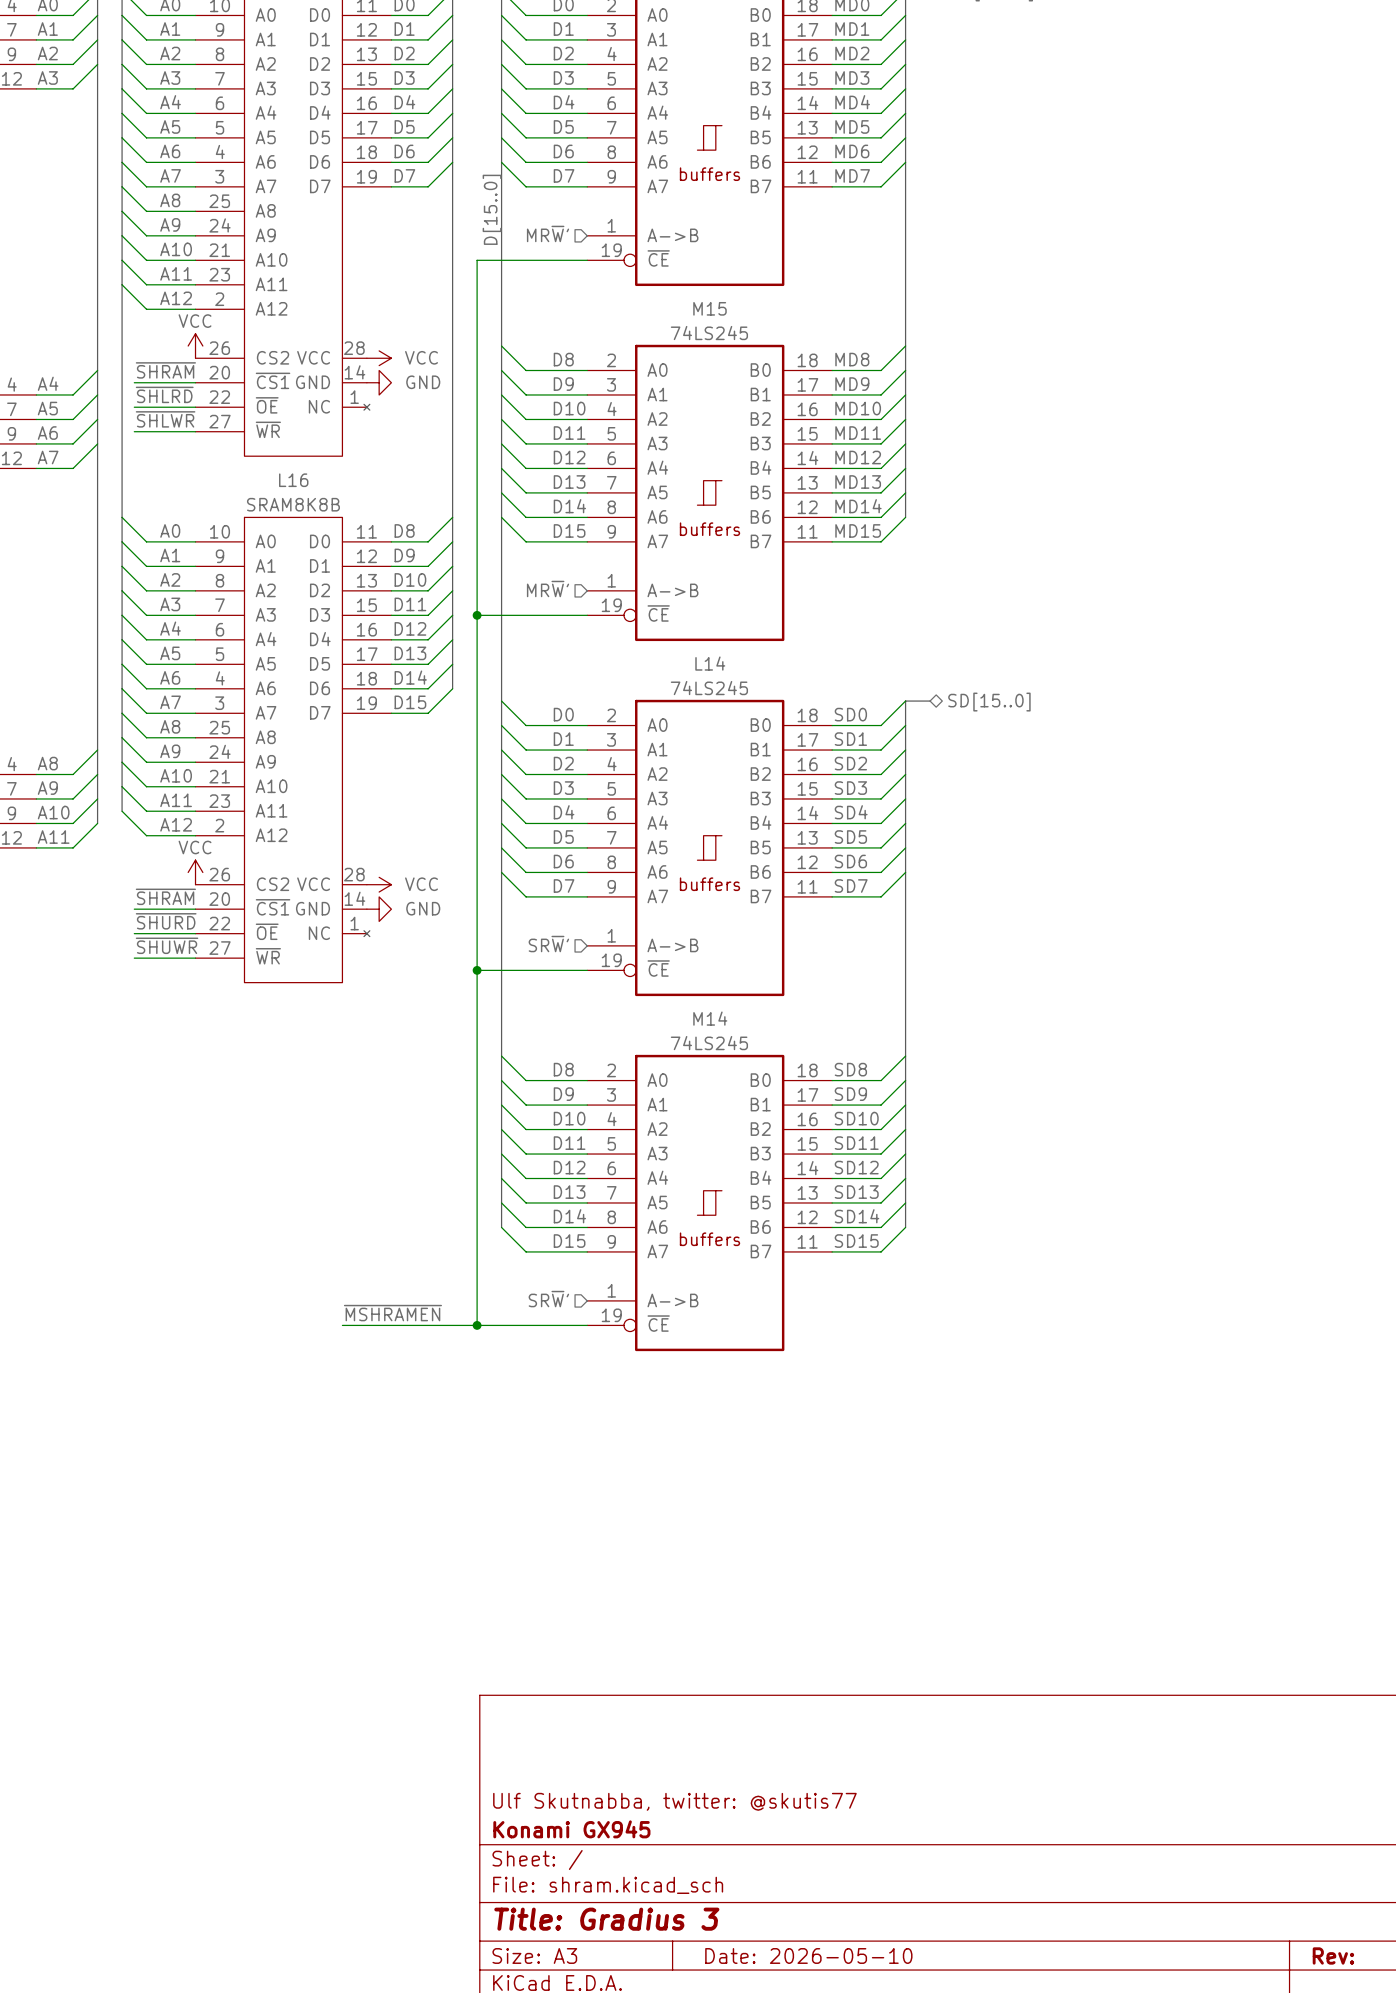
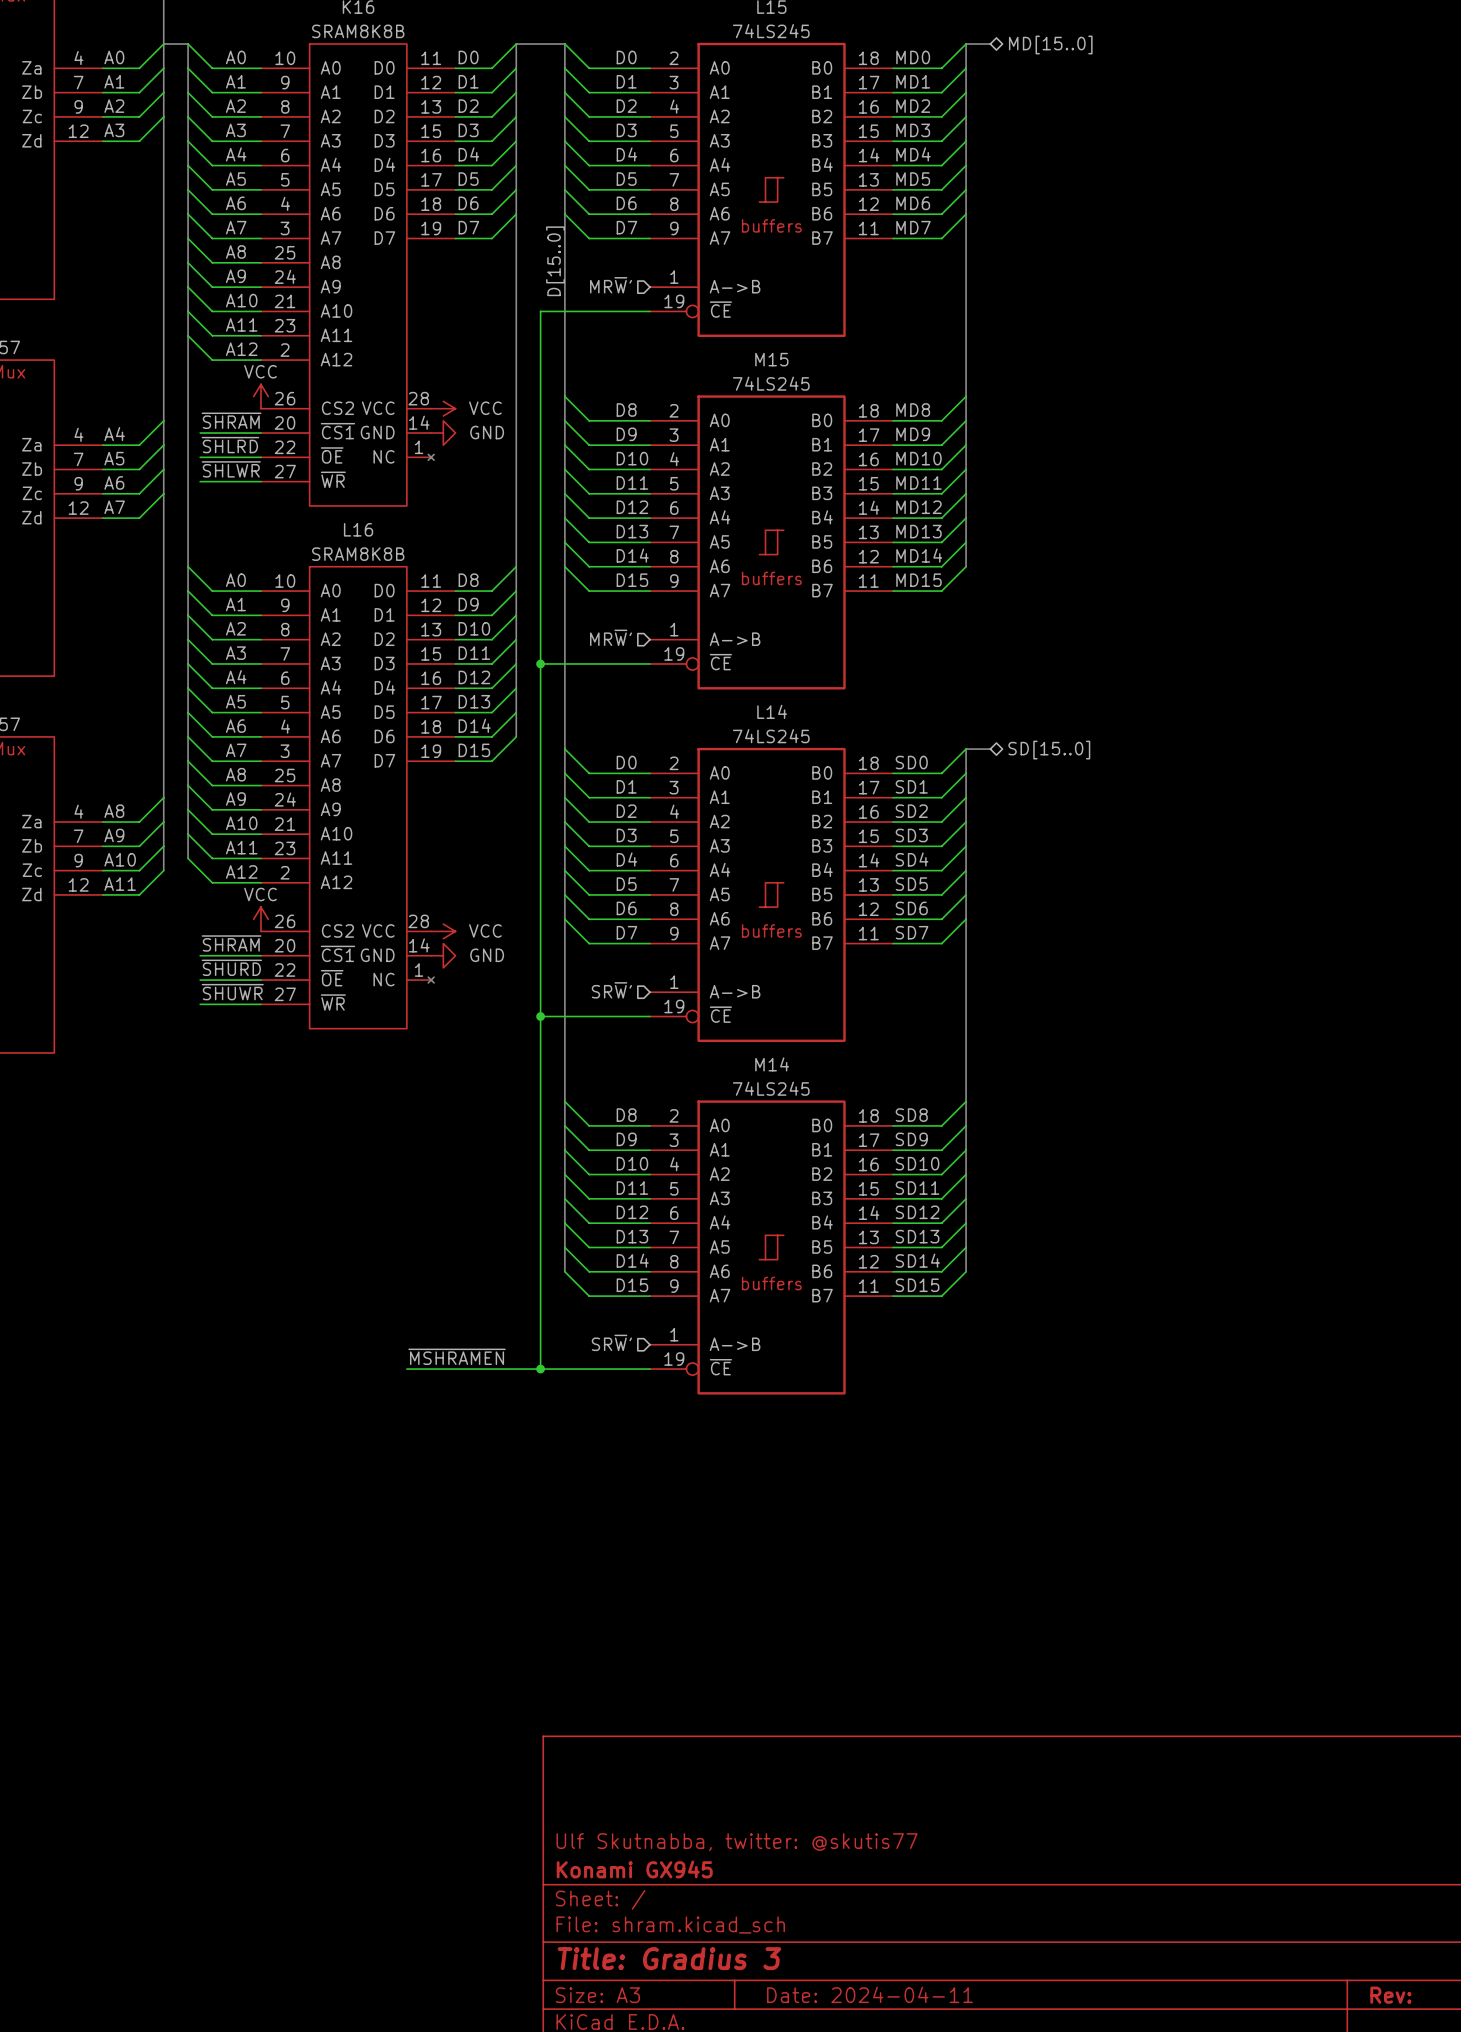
title block: Date: 2026-05-10 (808, 1955) -> Date: 2024-04-11 (870, 1994)

